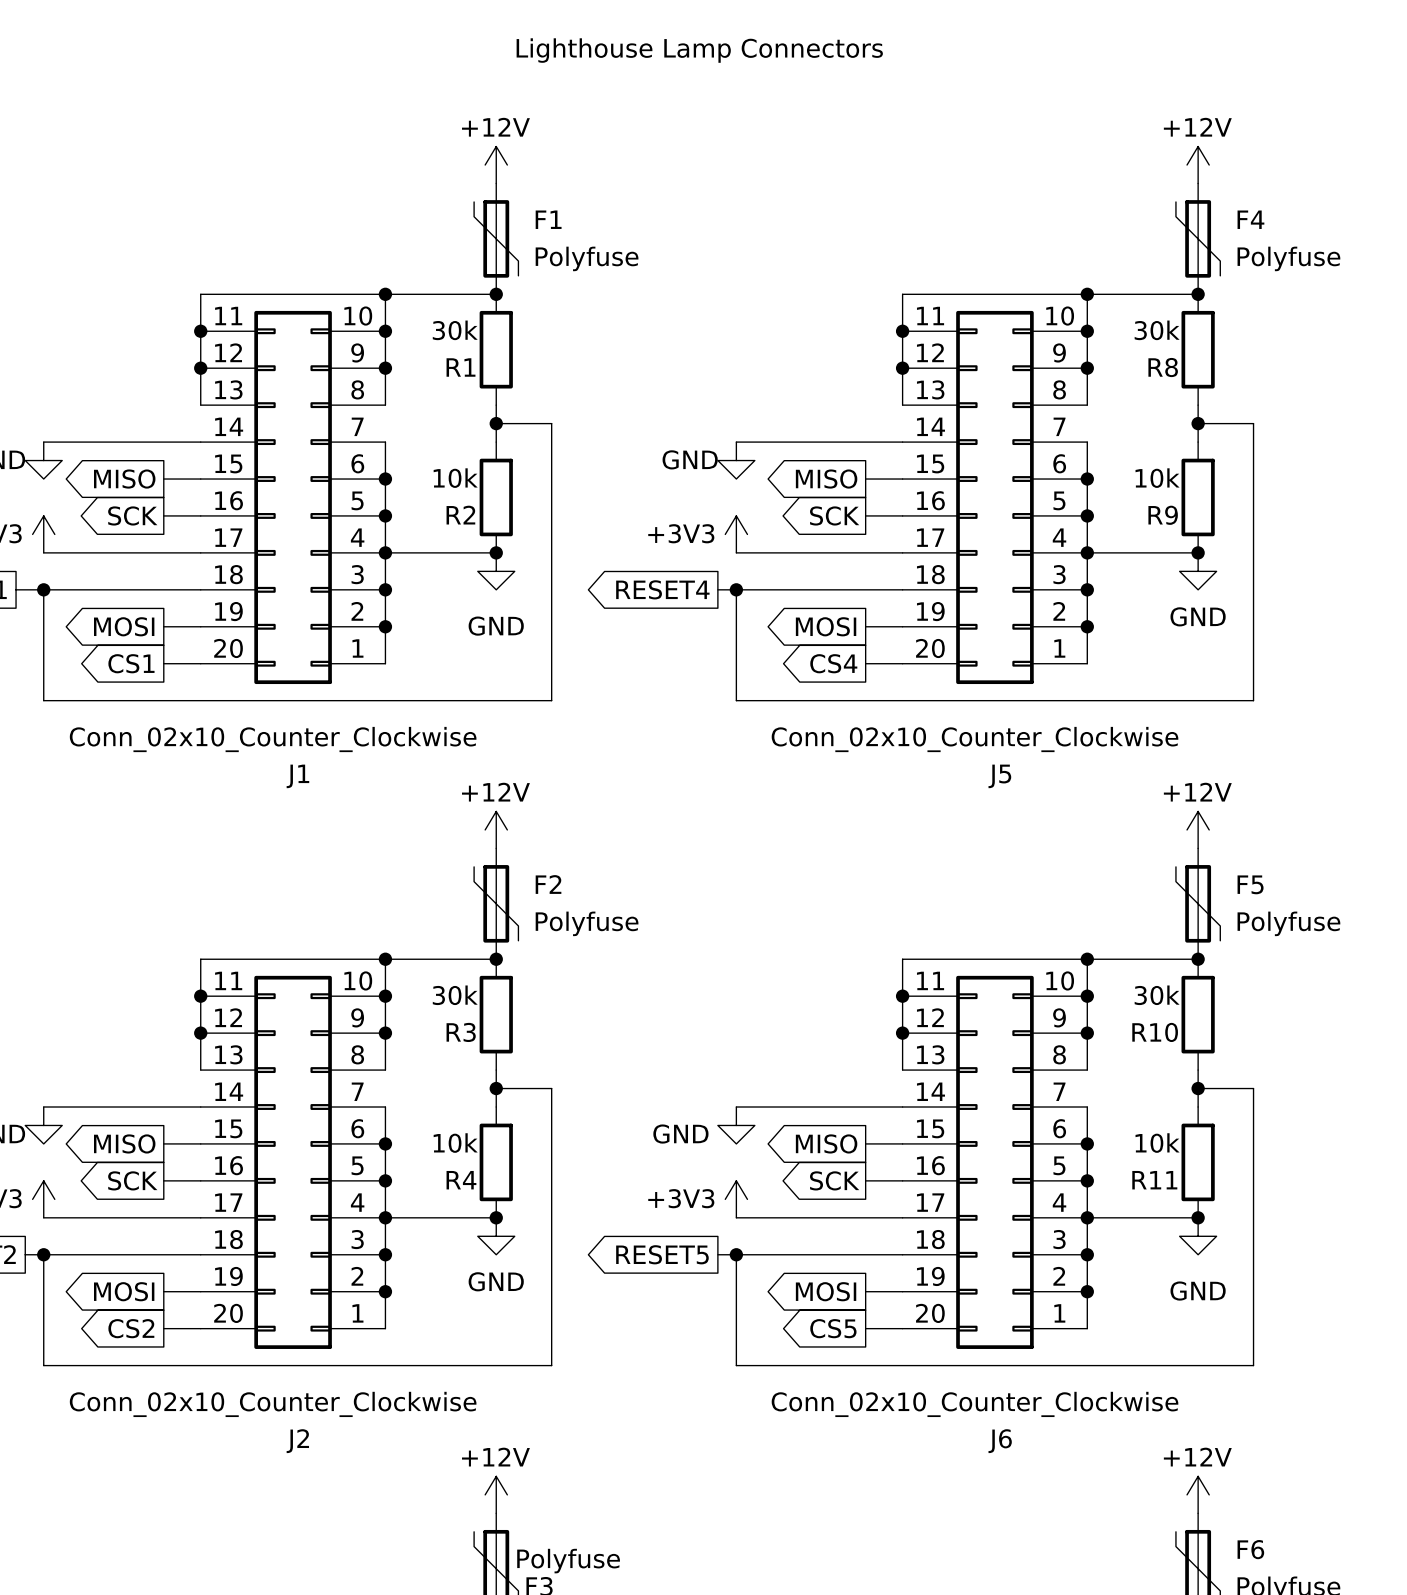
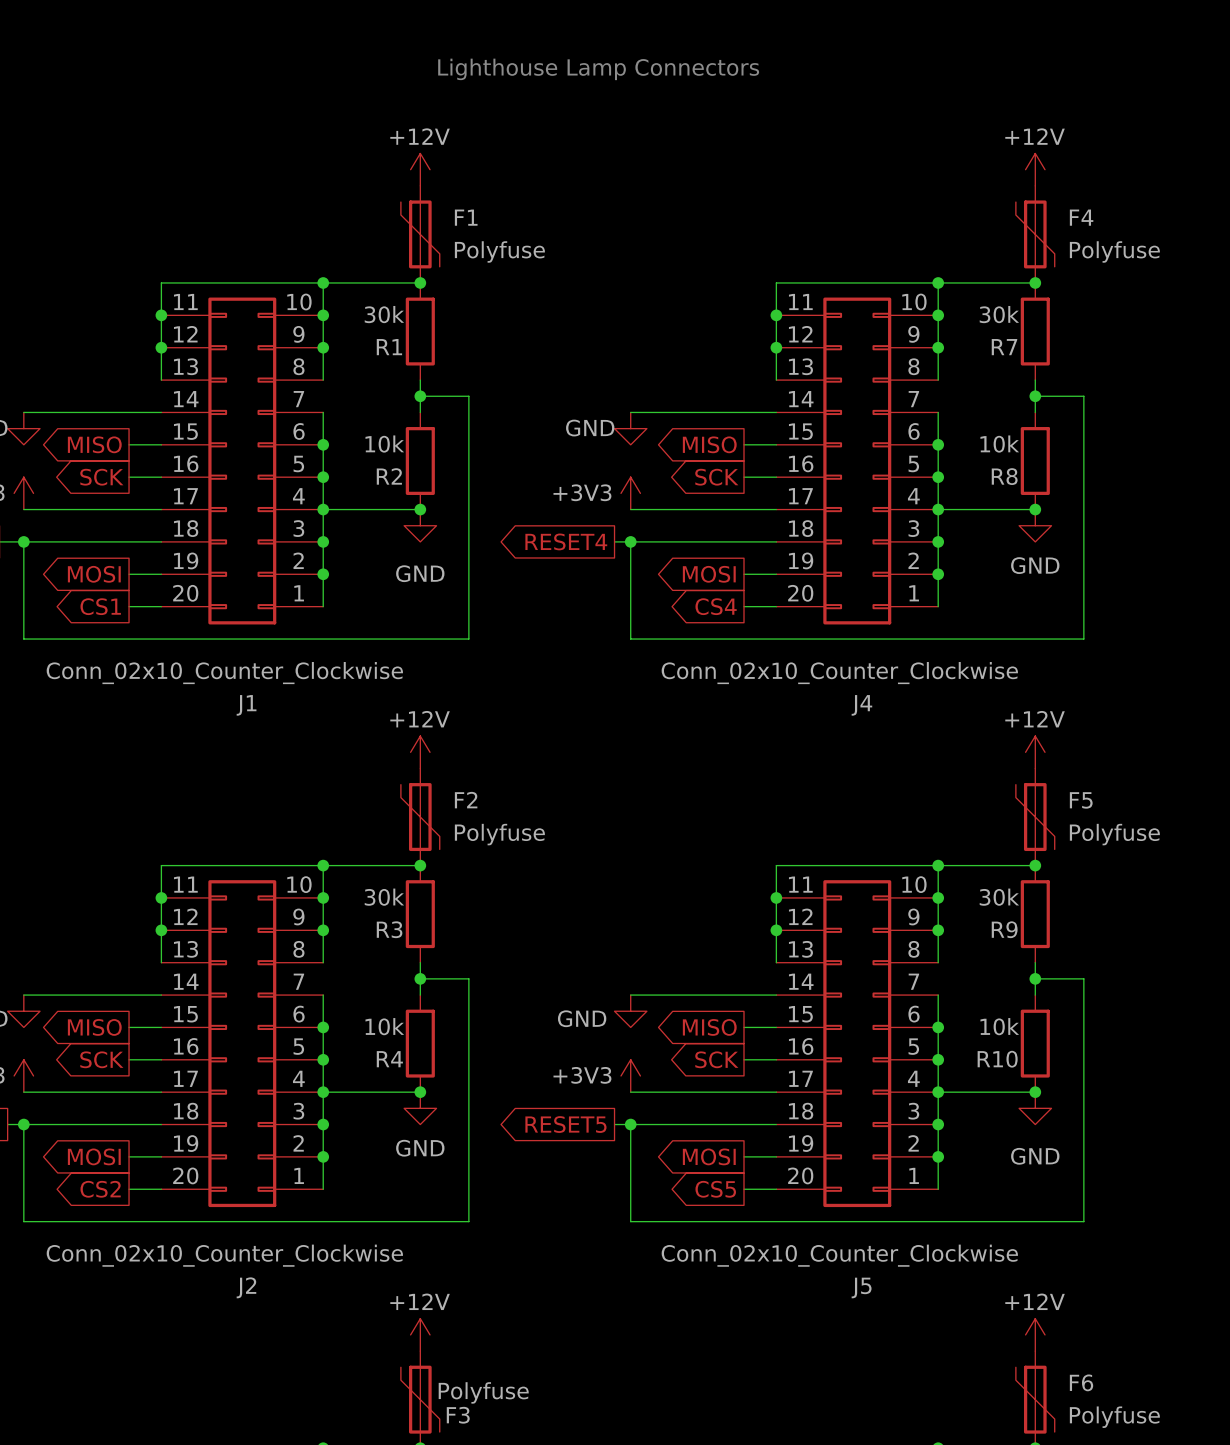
R8 name: R8 (1163, 367) -> R7 (1004, 347)
R9 name: R9 (1163, 515) -> R8 (1004, 476)
J5 name: J5 (999, 776) -> J4 (861, 705)
R10 name: R10 (1155, 1032) -> R9 (1004, 929)
R11 name: R11 (1154, 1180) -> R10 (997, 1059)
J6 name: J6 (1000, 1441) -> J5 (861, 1287)

